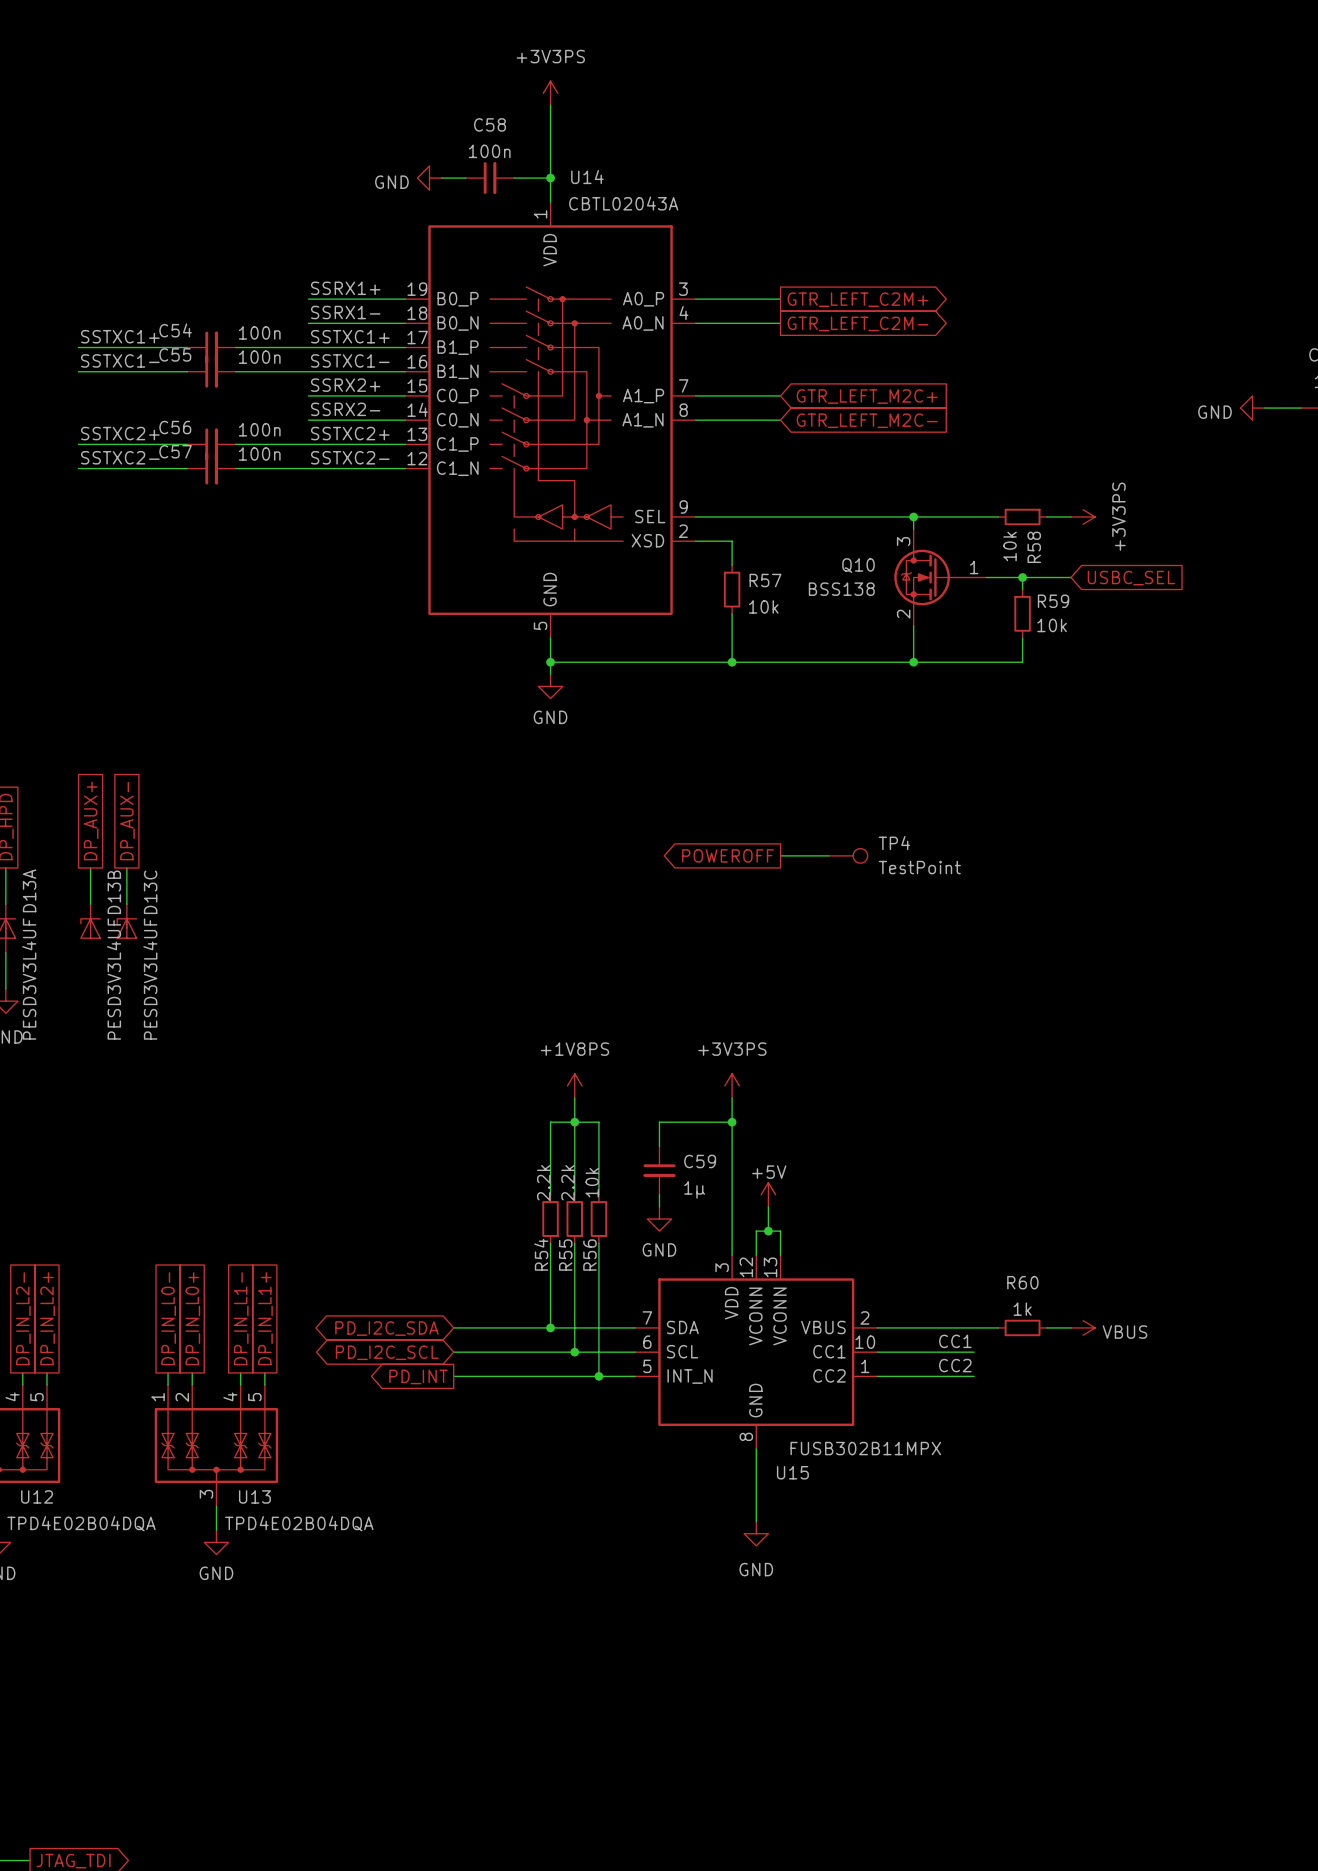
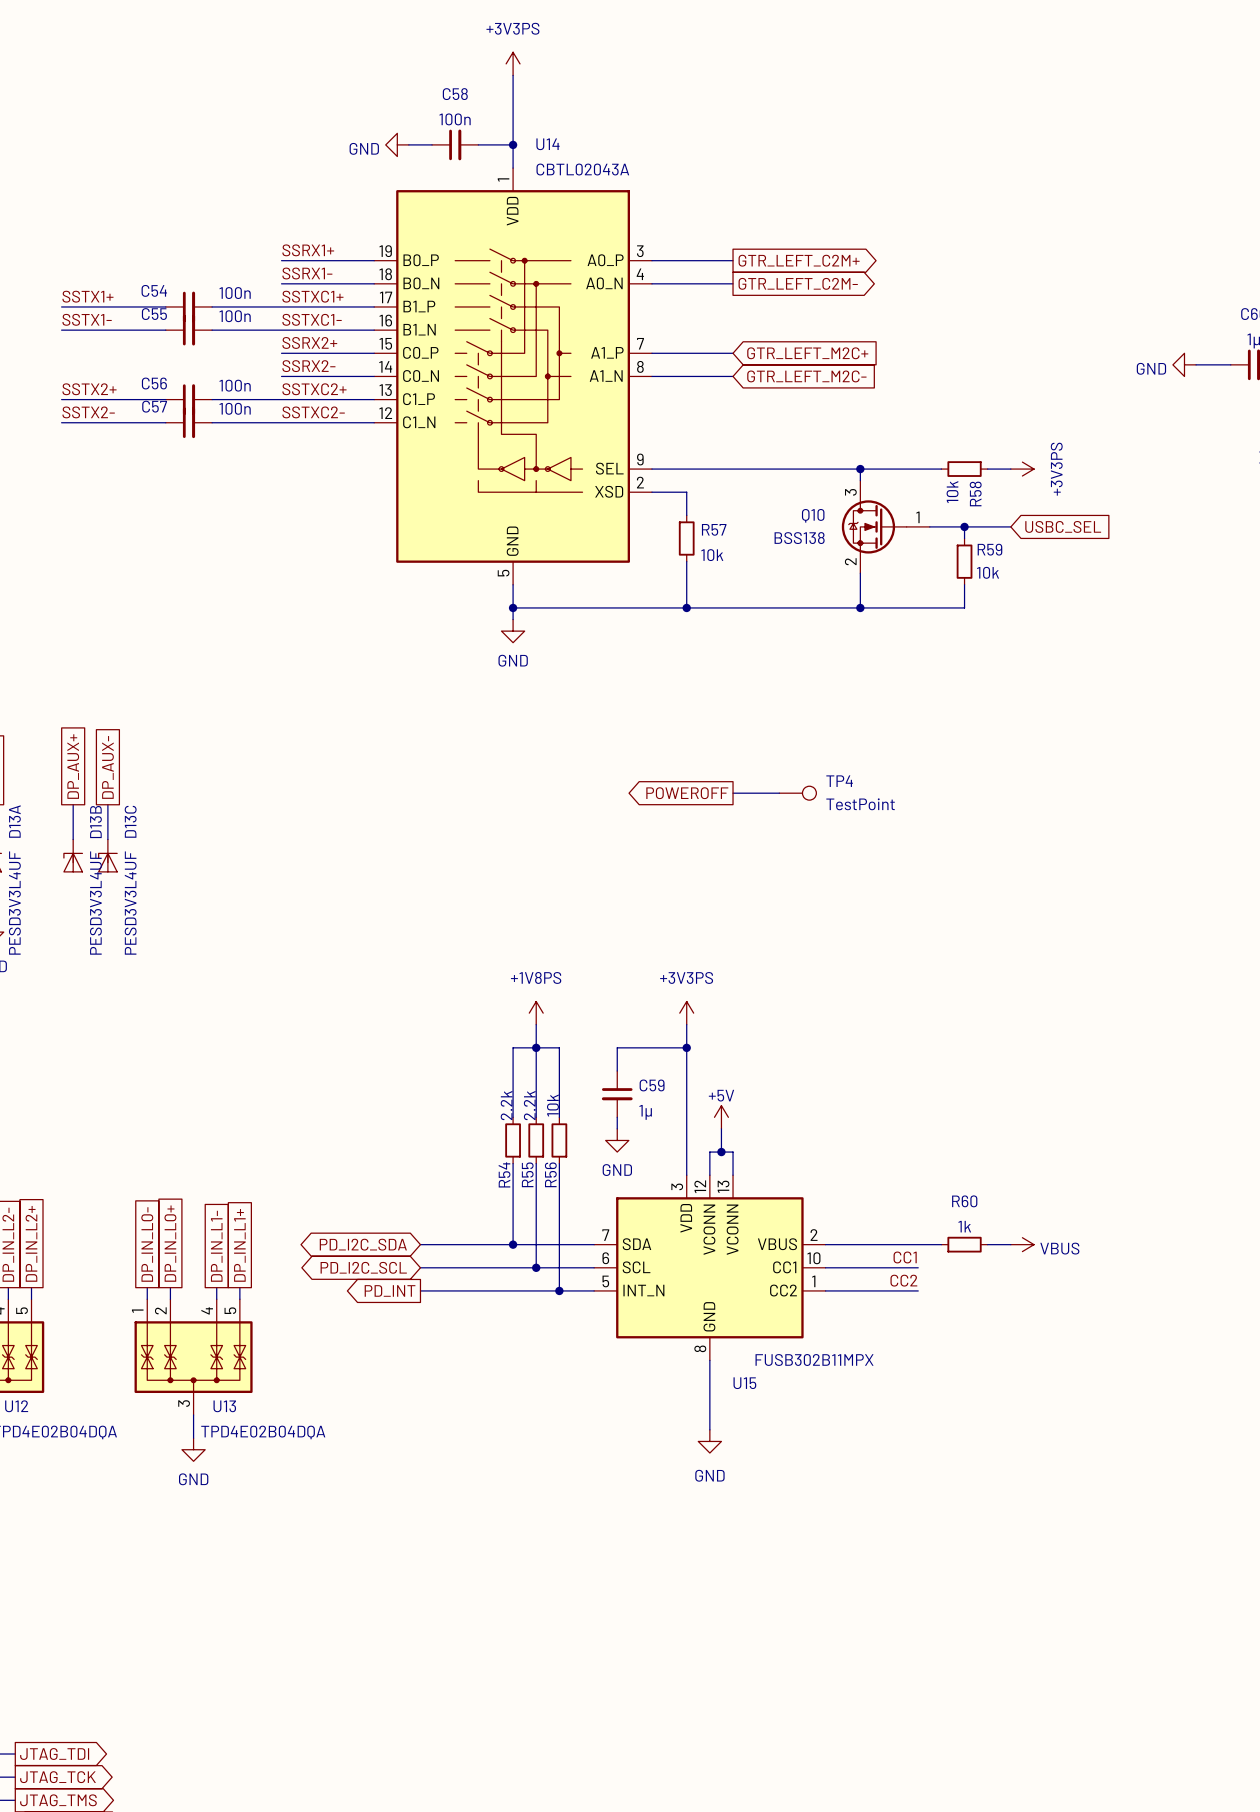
label: SSTXC1+ (120, 336) -> SSTX1+ (87, 296)
label: SSTXC1- (120, 360) -> SSTX1- (87, 319)
label: SSTXC2+ (120, 433) -> SSTX2+ (89, 389)
label: SSTXC2- (120, 457) -> SSTX2- (88, 412)

